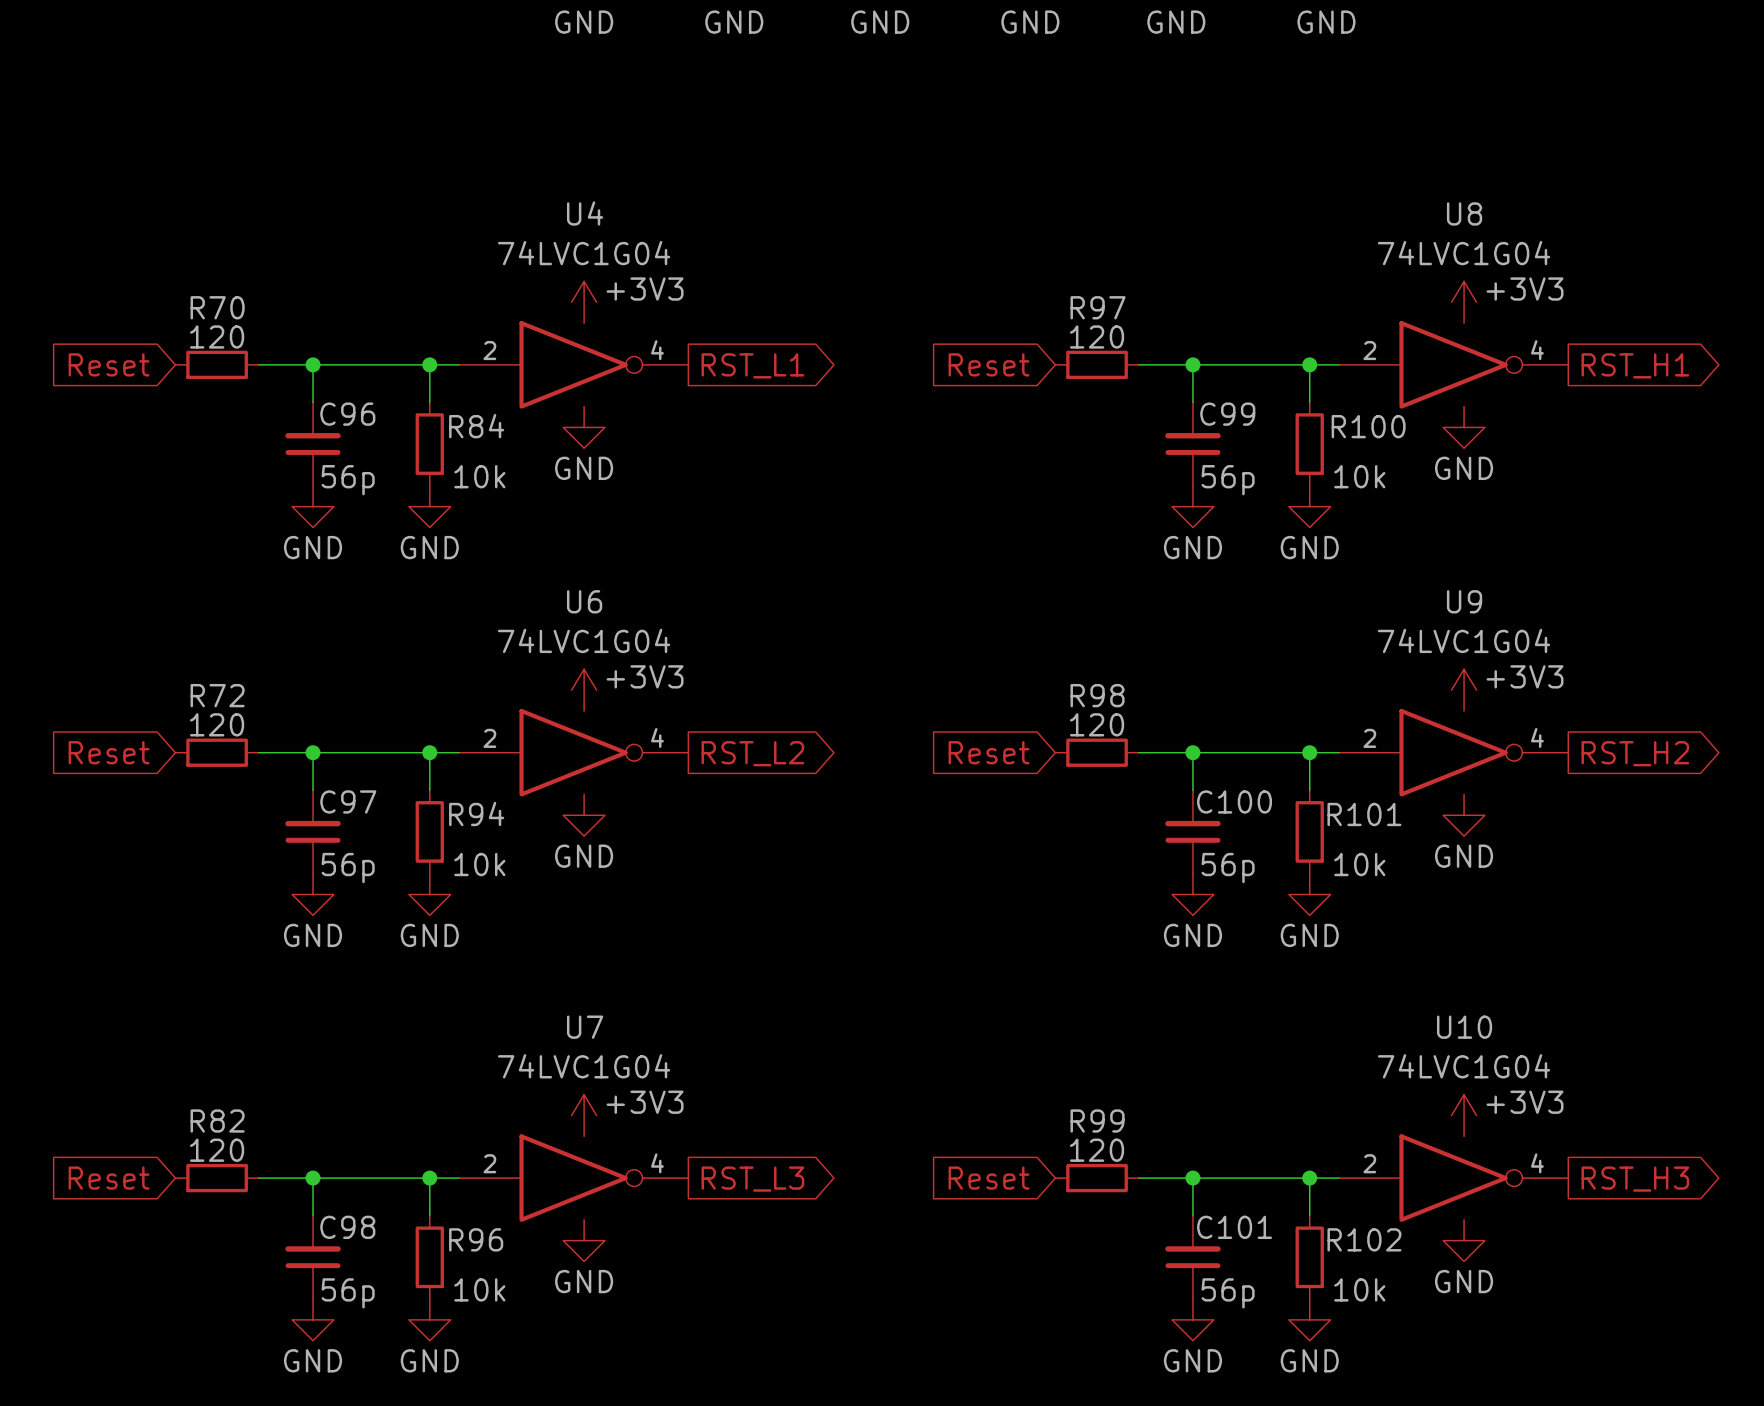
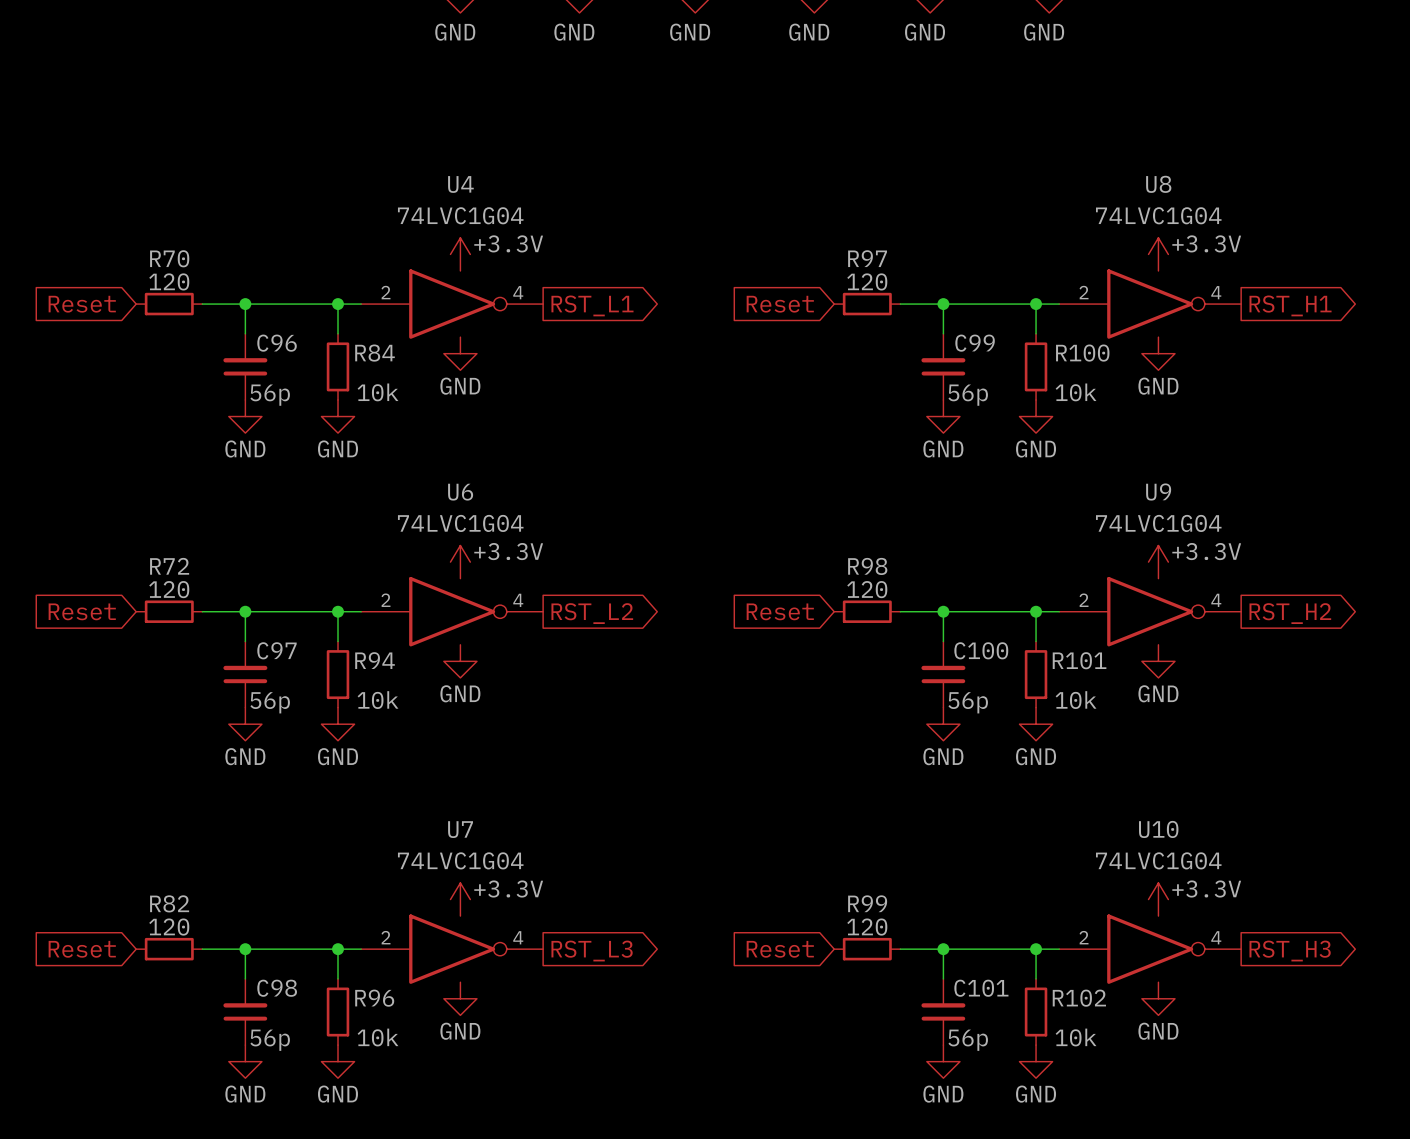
power symbol: +3V3 (584, 302) -> +3.3V (460, 254)
power symbol: +3V3 (1464, 302) -> +3.3V (1158, 254)
power symbol: +3V3 (584, 690) -> +3.3V (460, 562)
power symbol: +3V3 (1464, 690) -> +3.3V (1158, 562)
power symbol: +3V3 (584, 1115) -> +3.3V (460, 899)
power symbol: +3V3 (1464, 1115) -> +3.3V (1158, 899)

